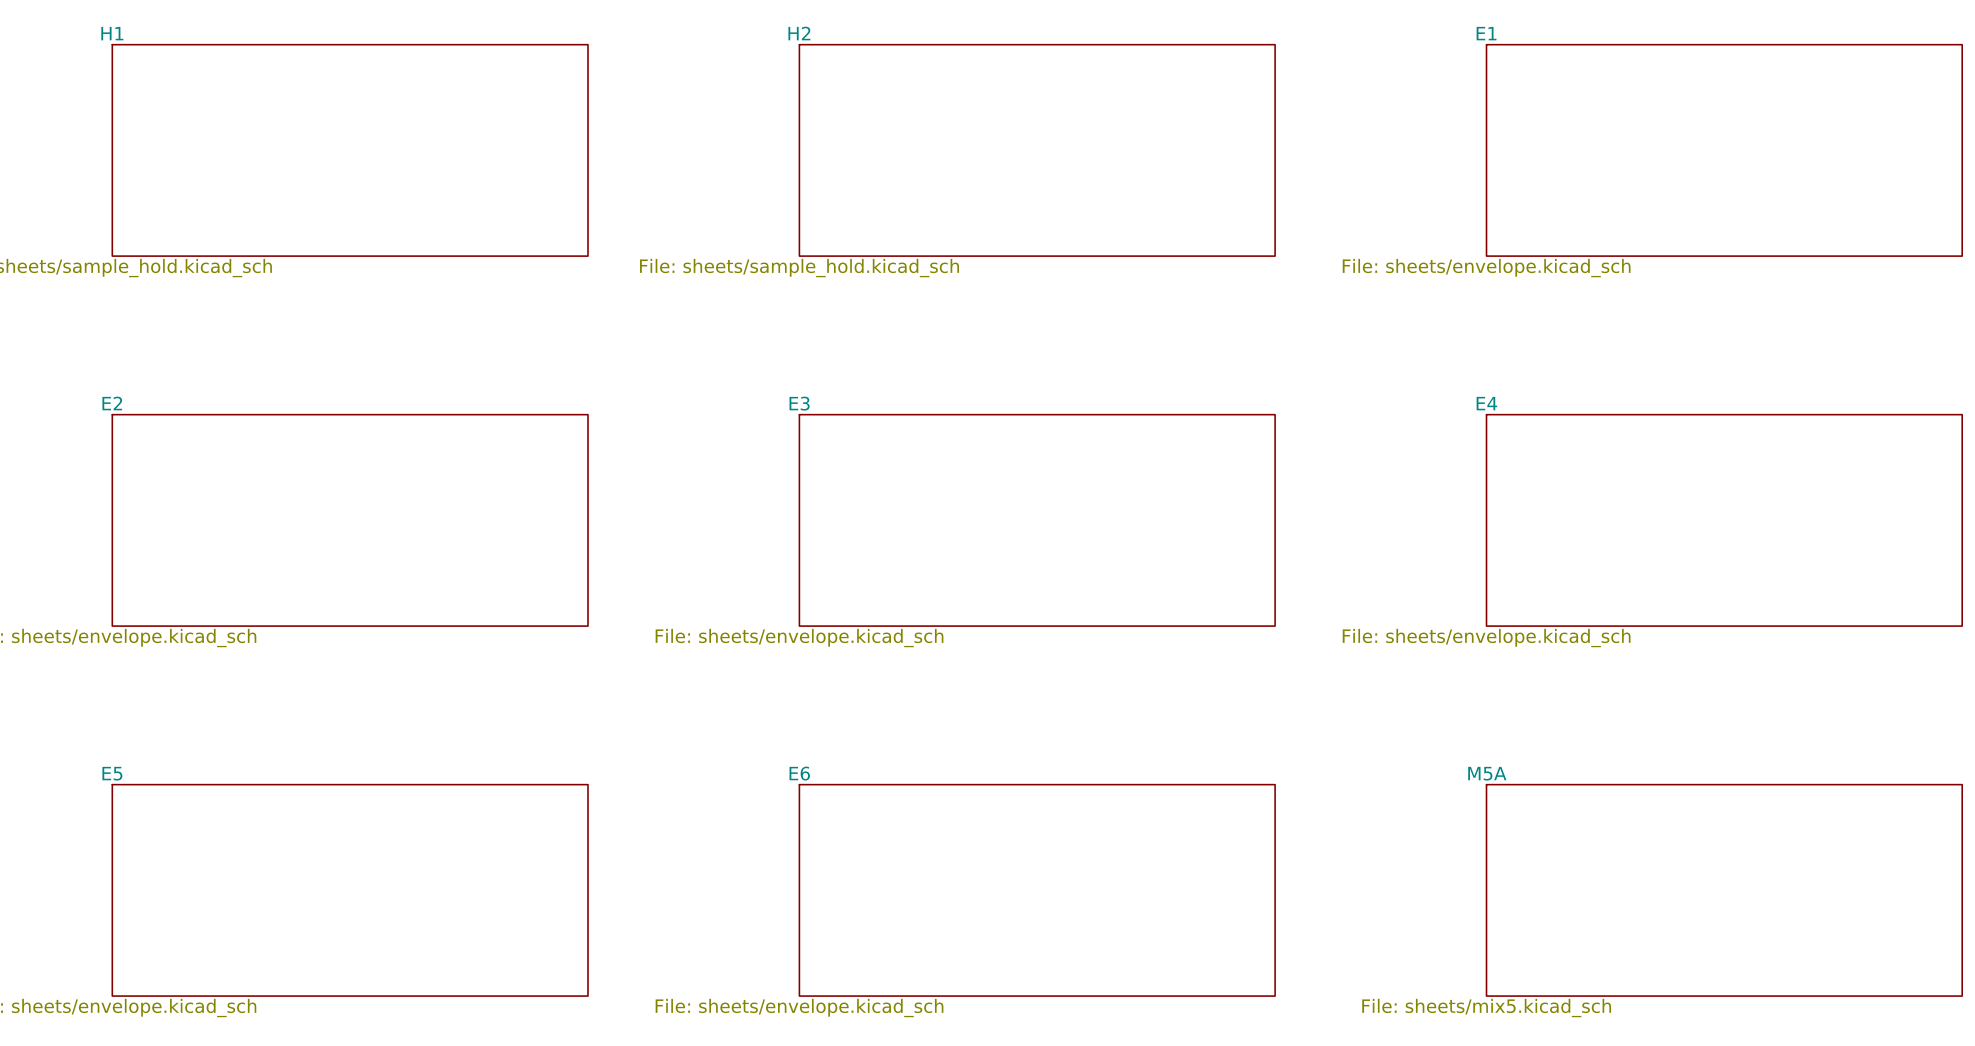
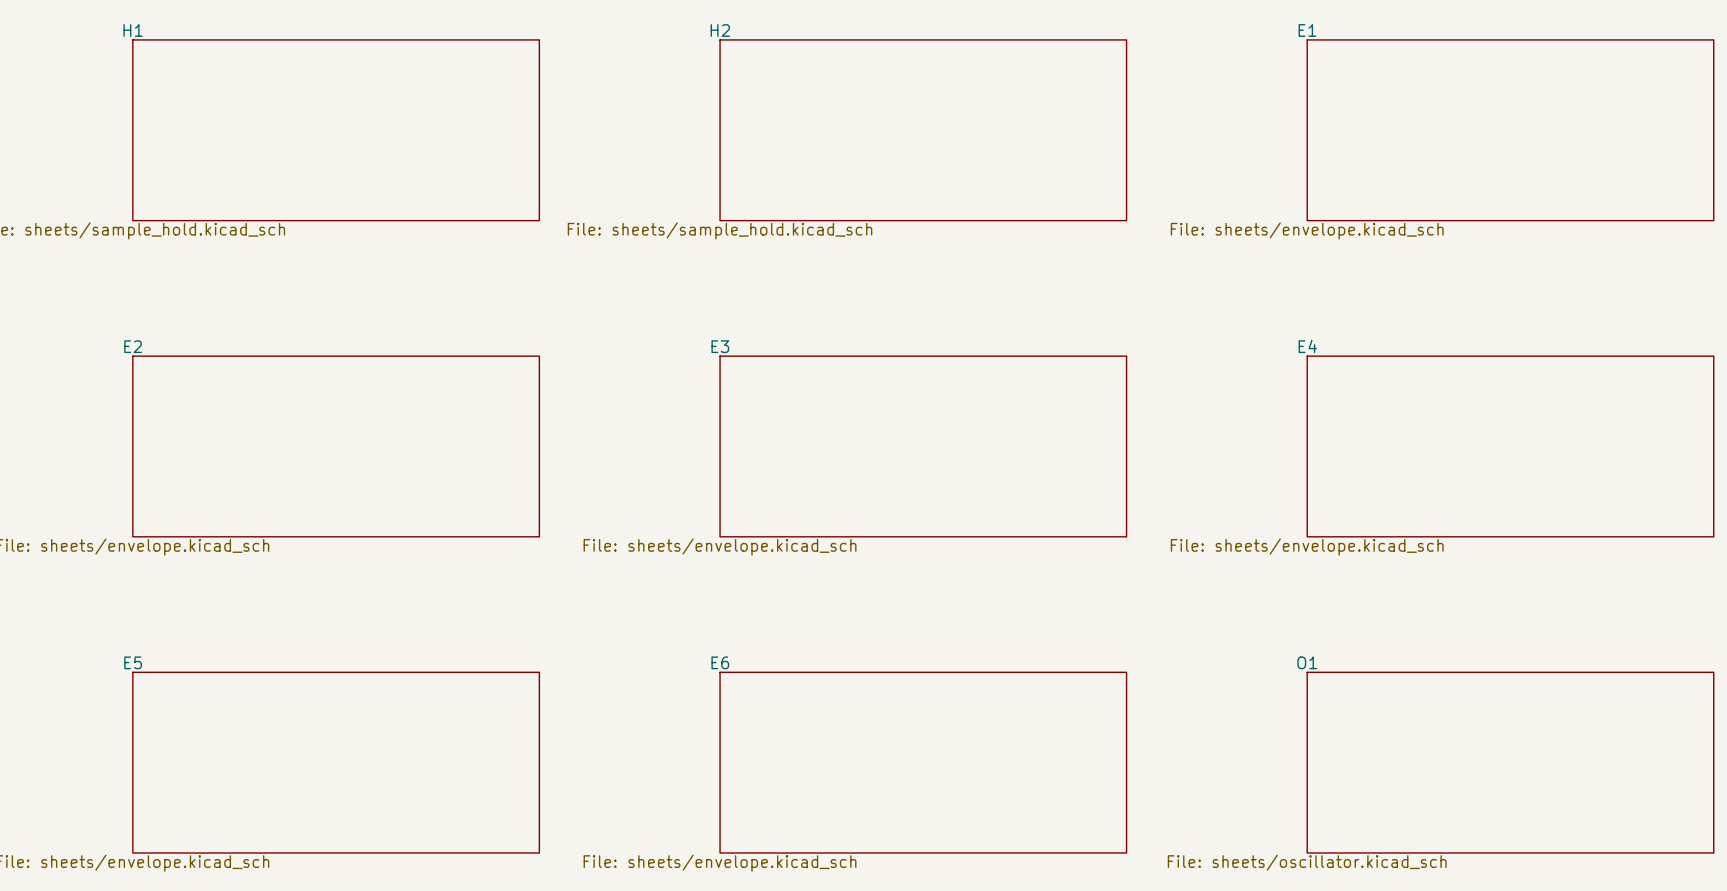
sheet M5A name: M5A (1487, 773) -> O1 (1307, 662)
sheet M5A value: File: sheets/mix5.kicad_sch (1486, 1008) -> File: sheets/oscillator.kicad_sch (1307, 862)

